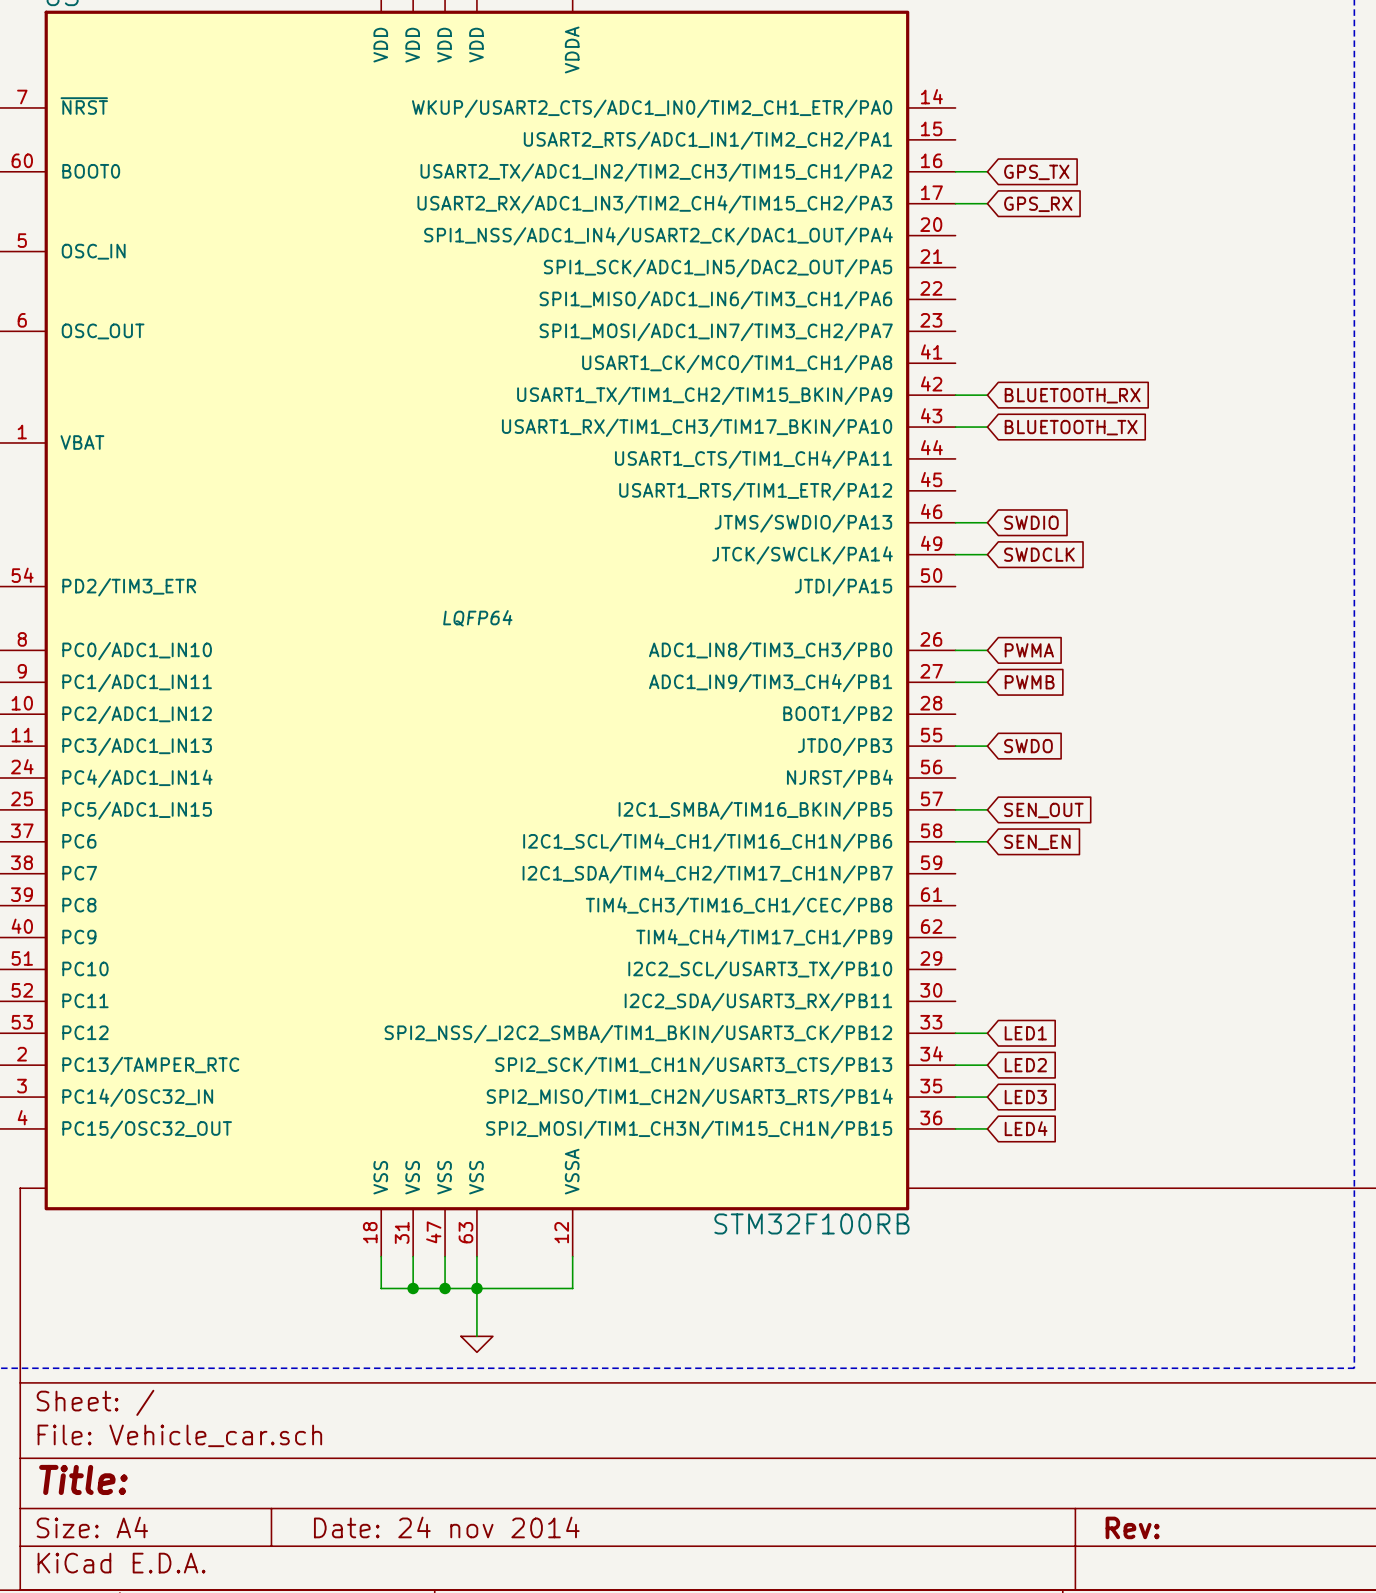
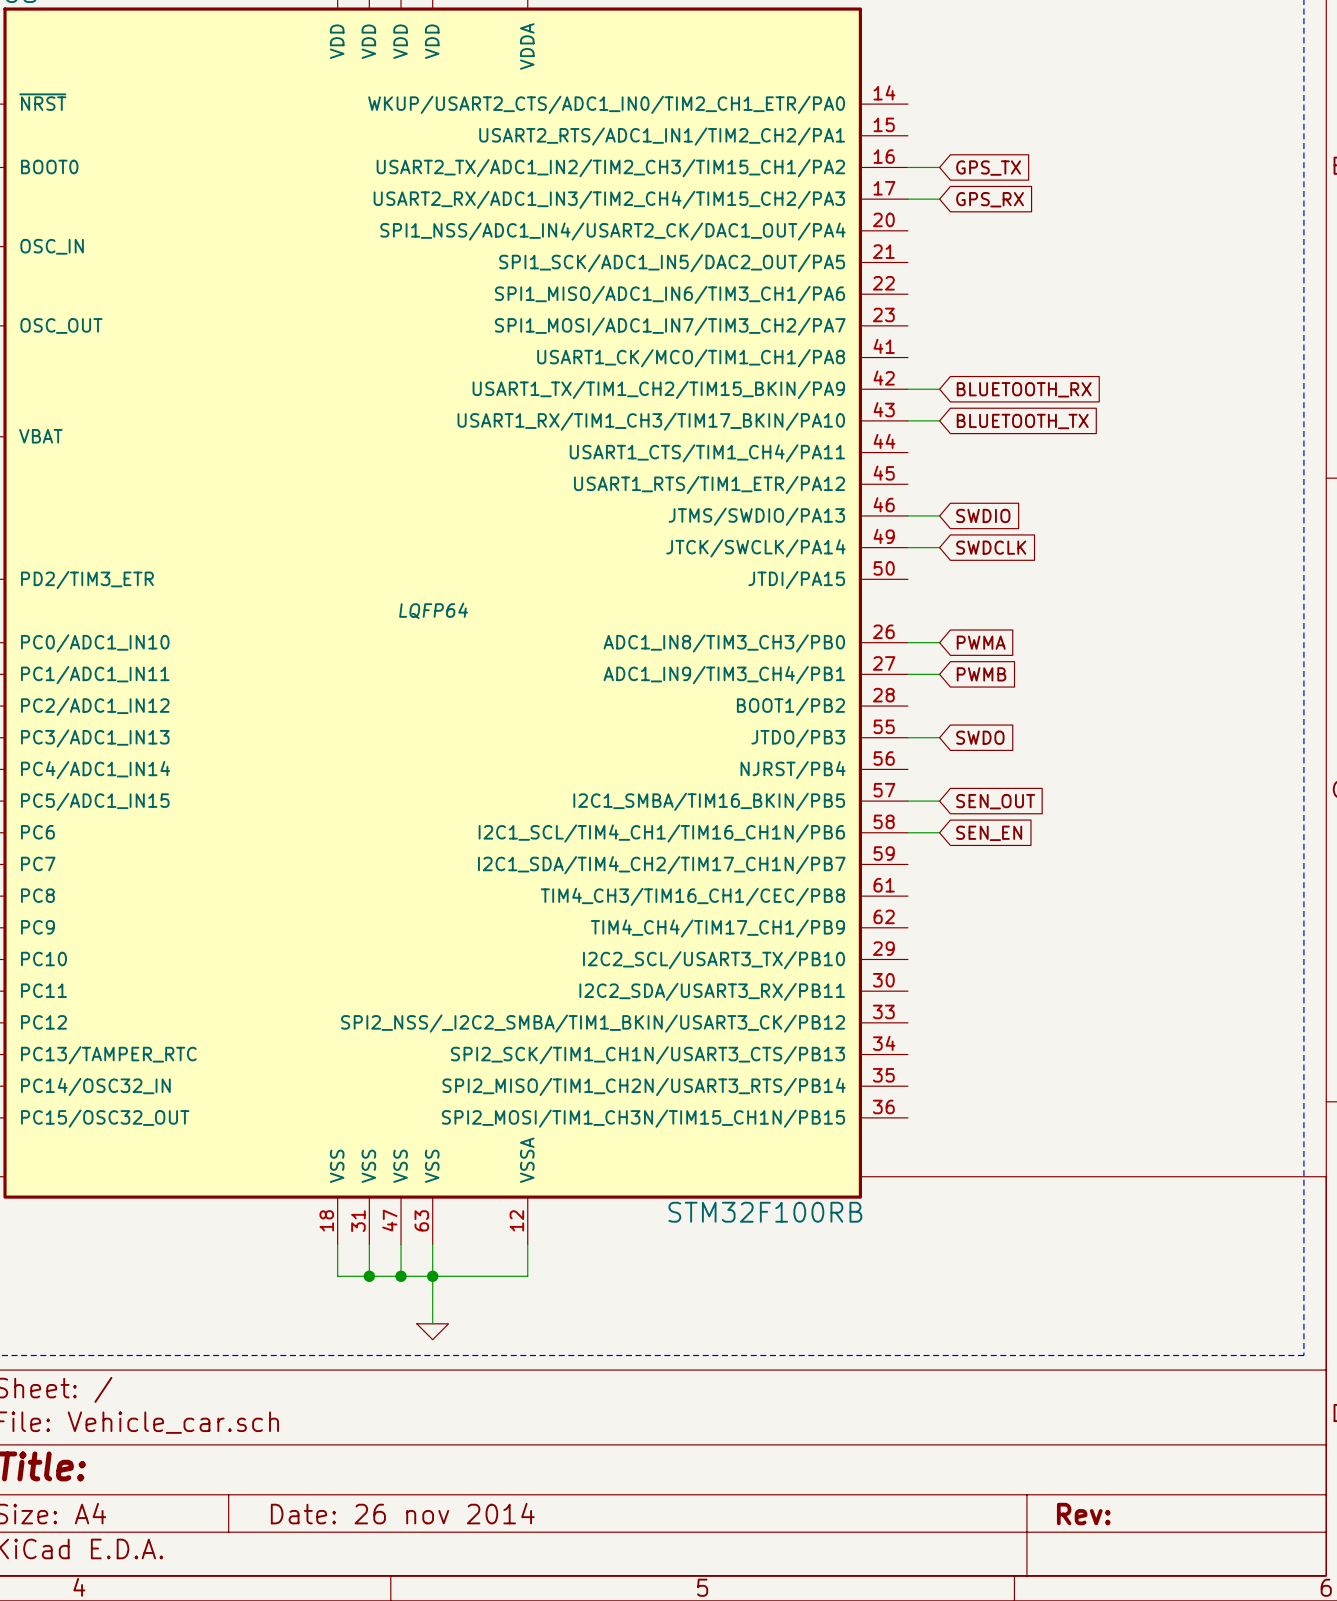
wire: (955, 1033) (987, 1033) -> none
global label: LED1 (1025, 1033) -> none
wire: (955, 1065) (987, 1065) -> none
global label: LED2 (1025, 1065) -> none
wire: (955, 1097) (987, 1097) -> none
global label: LED3 (1025, 1097) -> none
wire: (955, 1128) (987, 1128) -> none
global label: LED4 (1026, 1128) -> none
title block: Date: 24 nov 2014 (446, 1527) -> Date: 26 nov 2014 (402, 1513)

